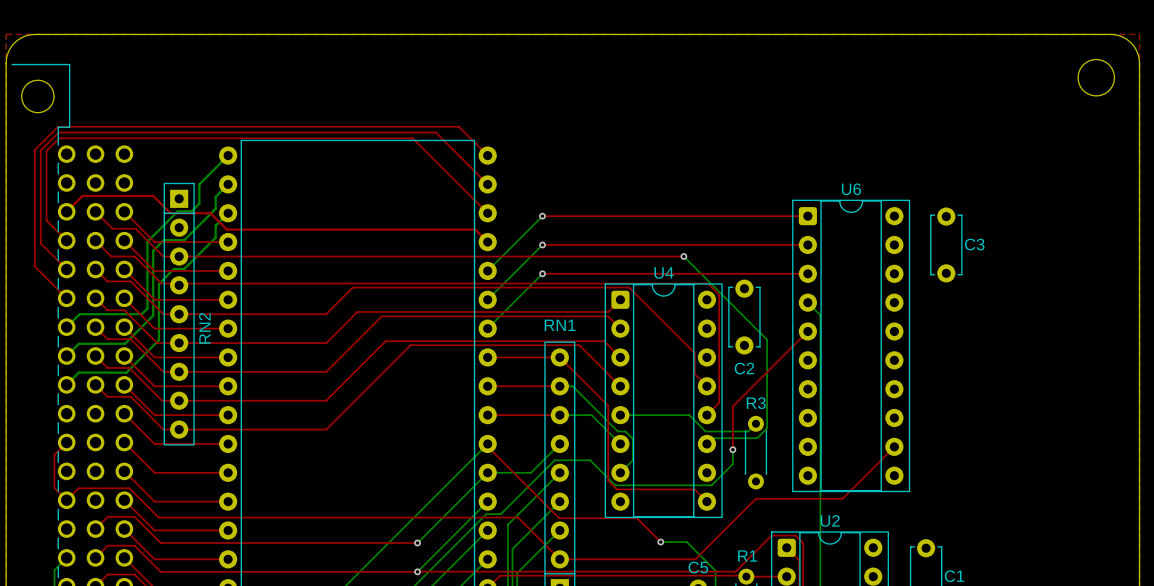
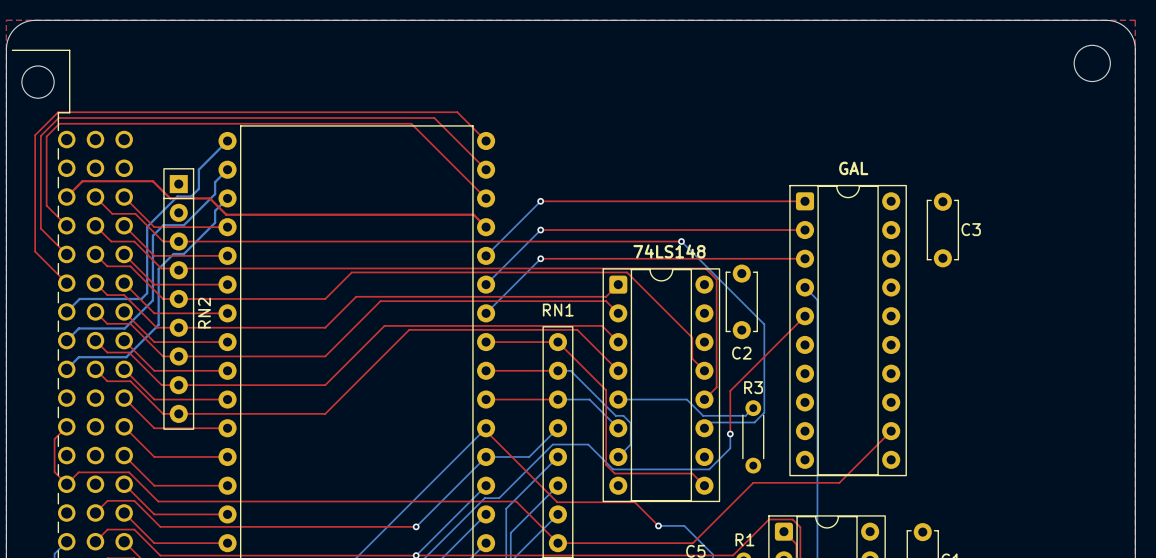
text: none -> GAL (853, 168)
U6 name: U6 (851, 189) -> none
text: none -> 74LS148 (669, 251)
U4 name: U4 (664, 272) -> none
U2 name: U2 (830, 520) -> none

